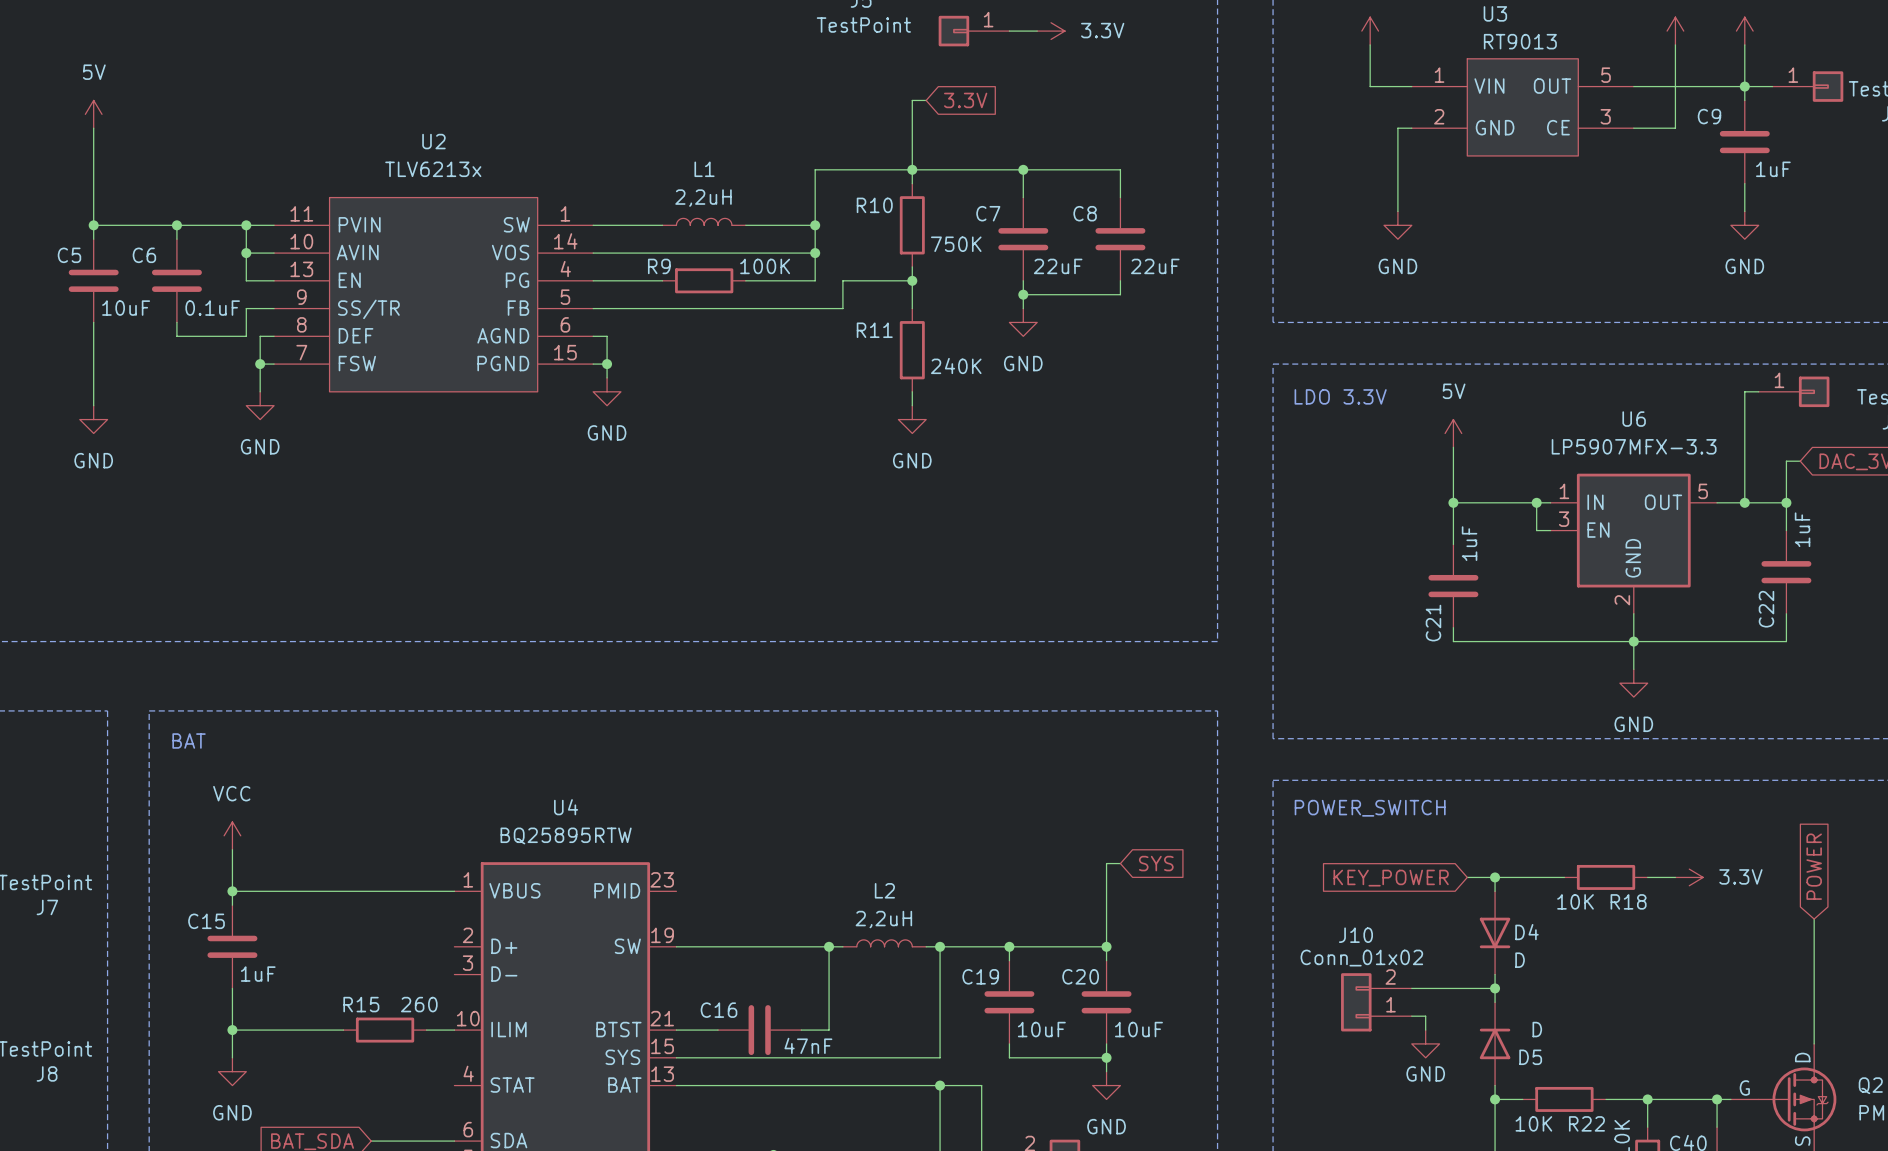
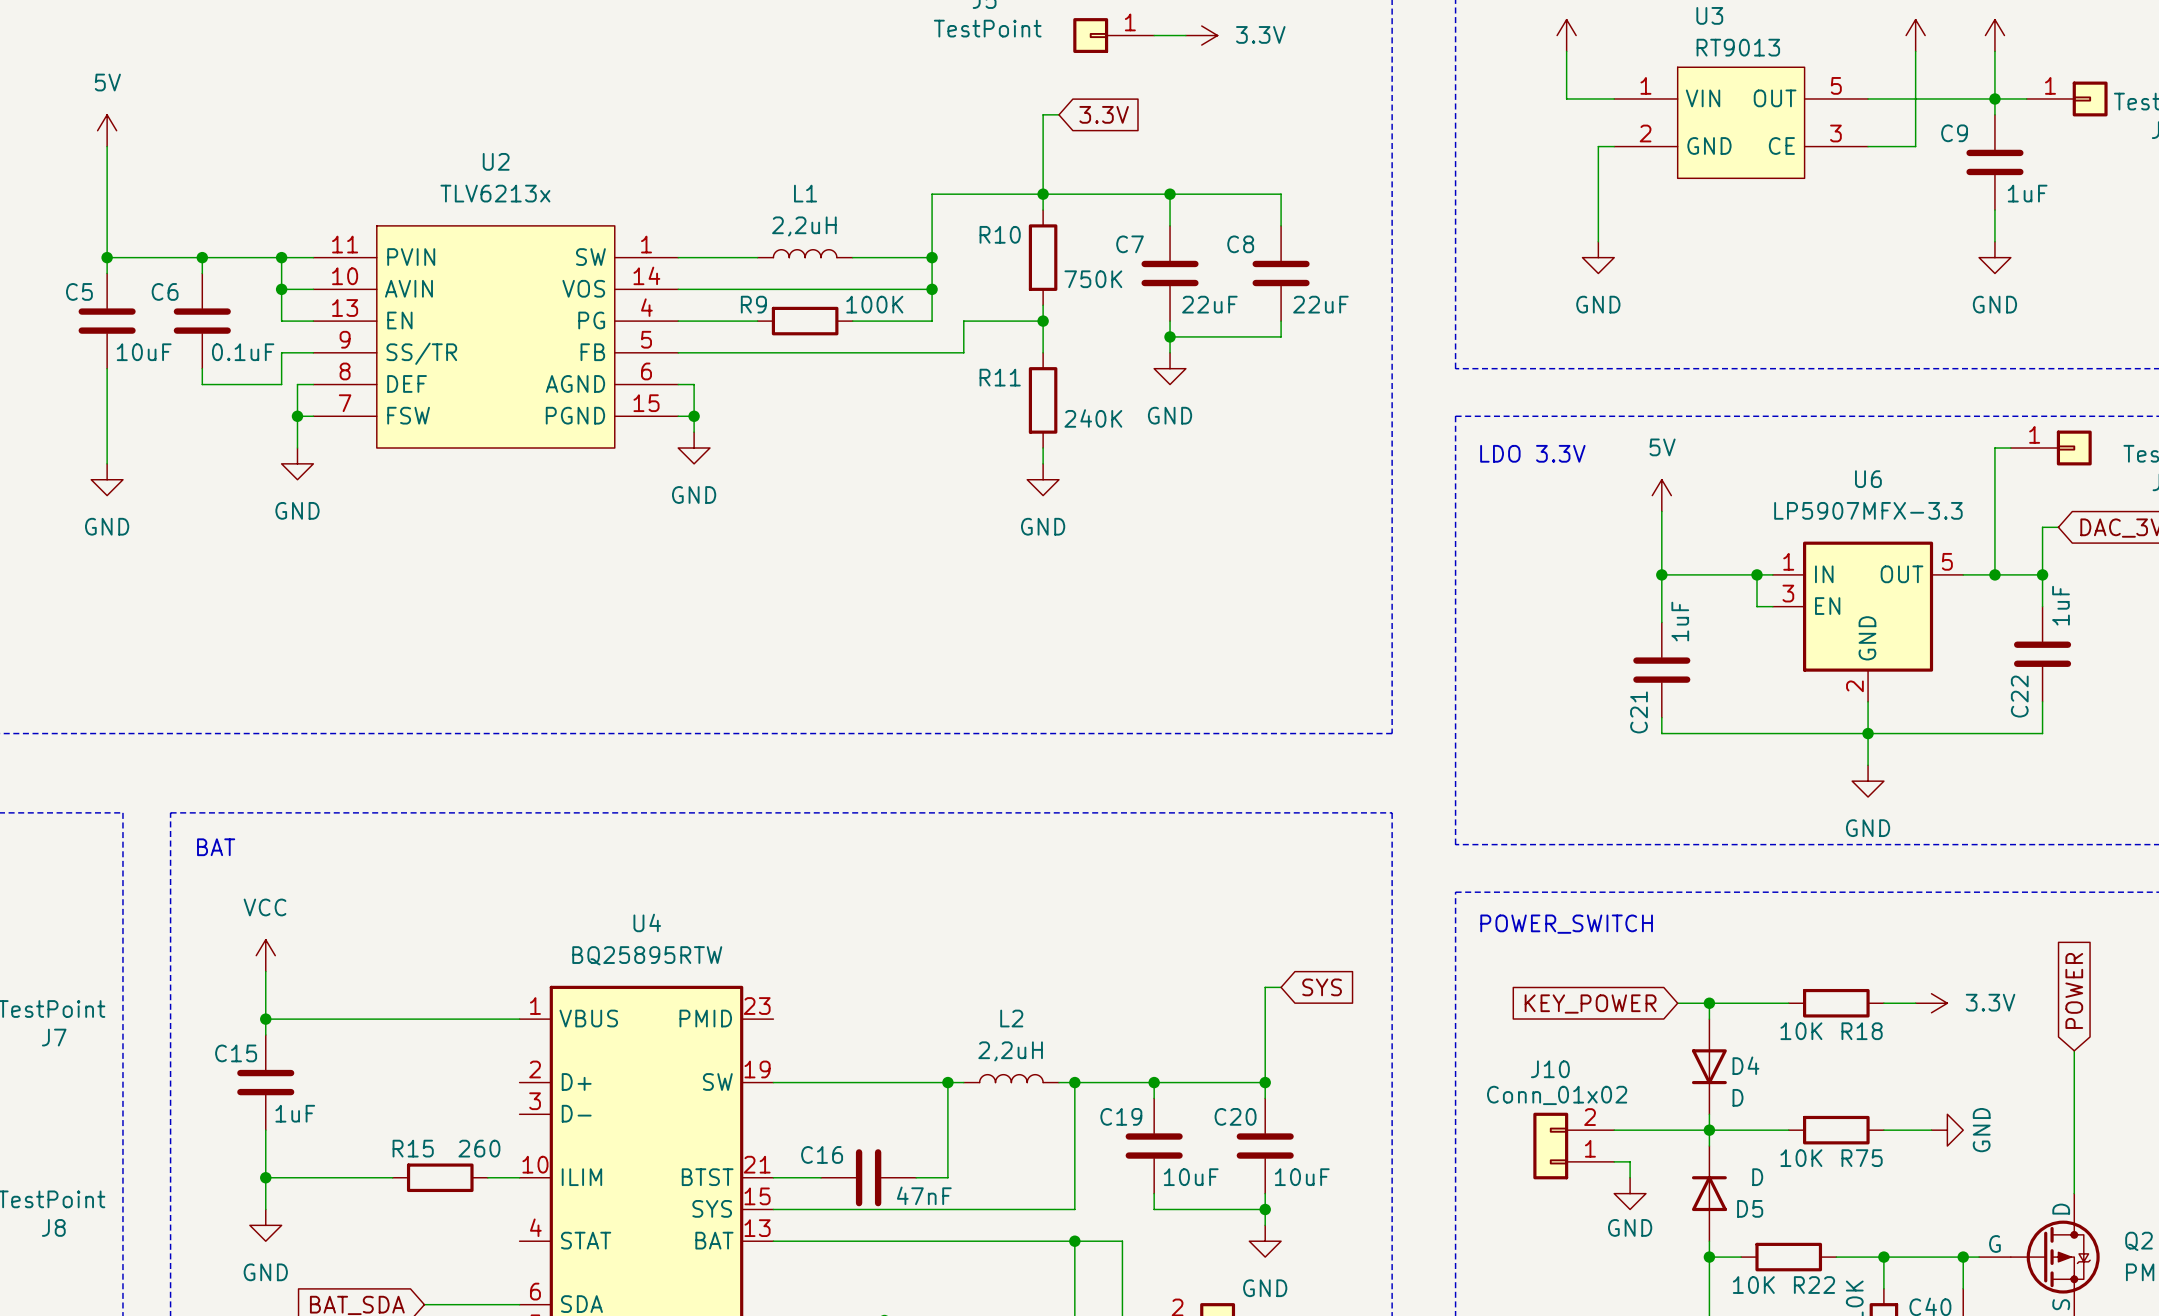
wire: none -> (1709, 1130) (1788, 1130)
R75: none -> 10K (1836, 1130)
wire: none -> (1883, 1130) (1931, 1130)
power symbol: none -> GND (1947, 1130)

